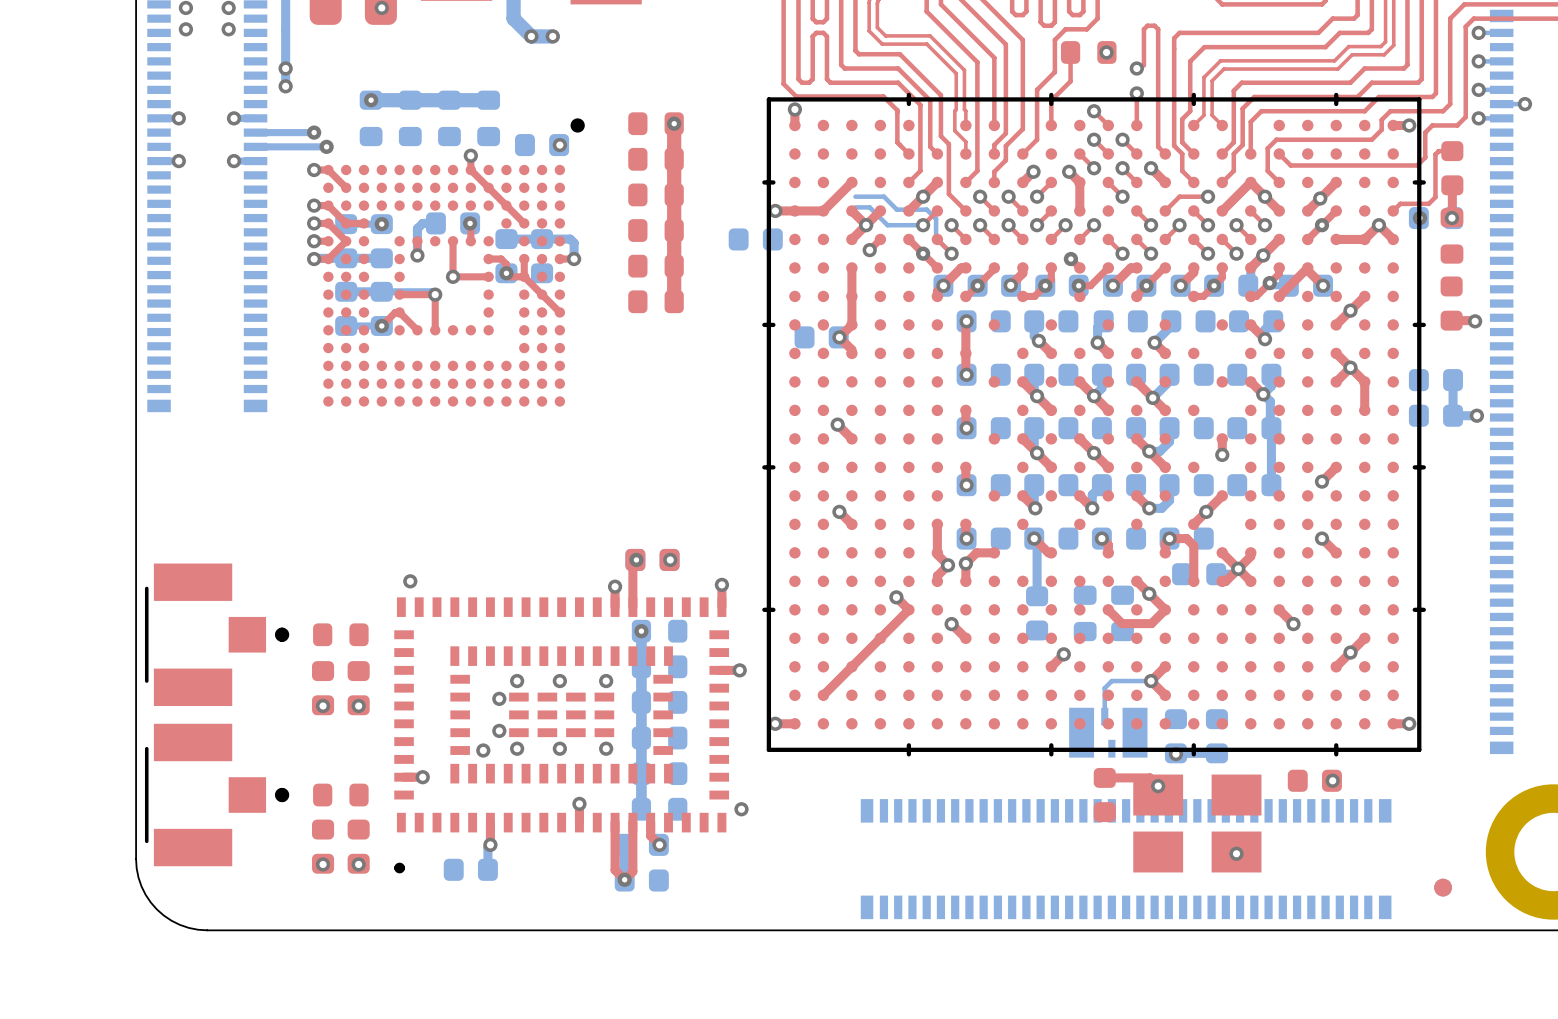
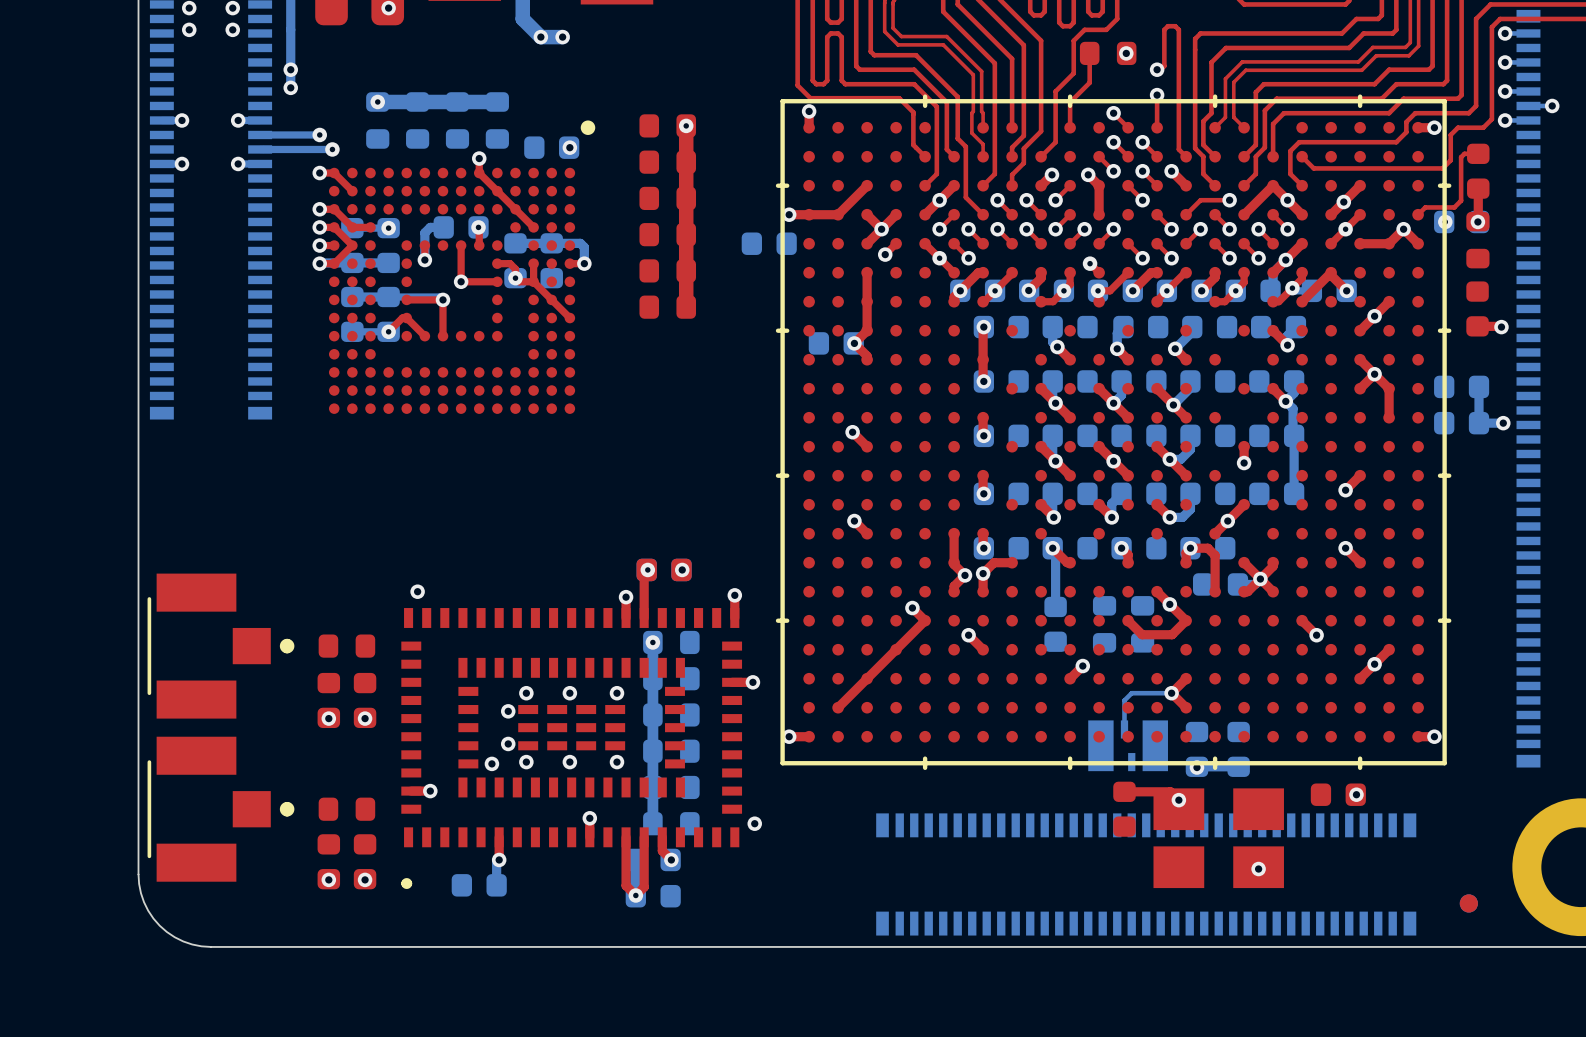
bottom track: (855, 196) (883, 196) (896, 209) (926, 209) (936, 218) (936, 238) (951, 253) -> none
bottom track: (855, 207) (869, 207) (887, 225) (923, 225) -> none

